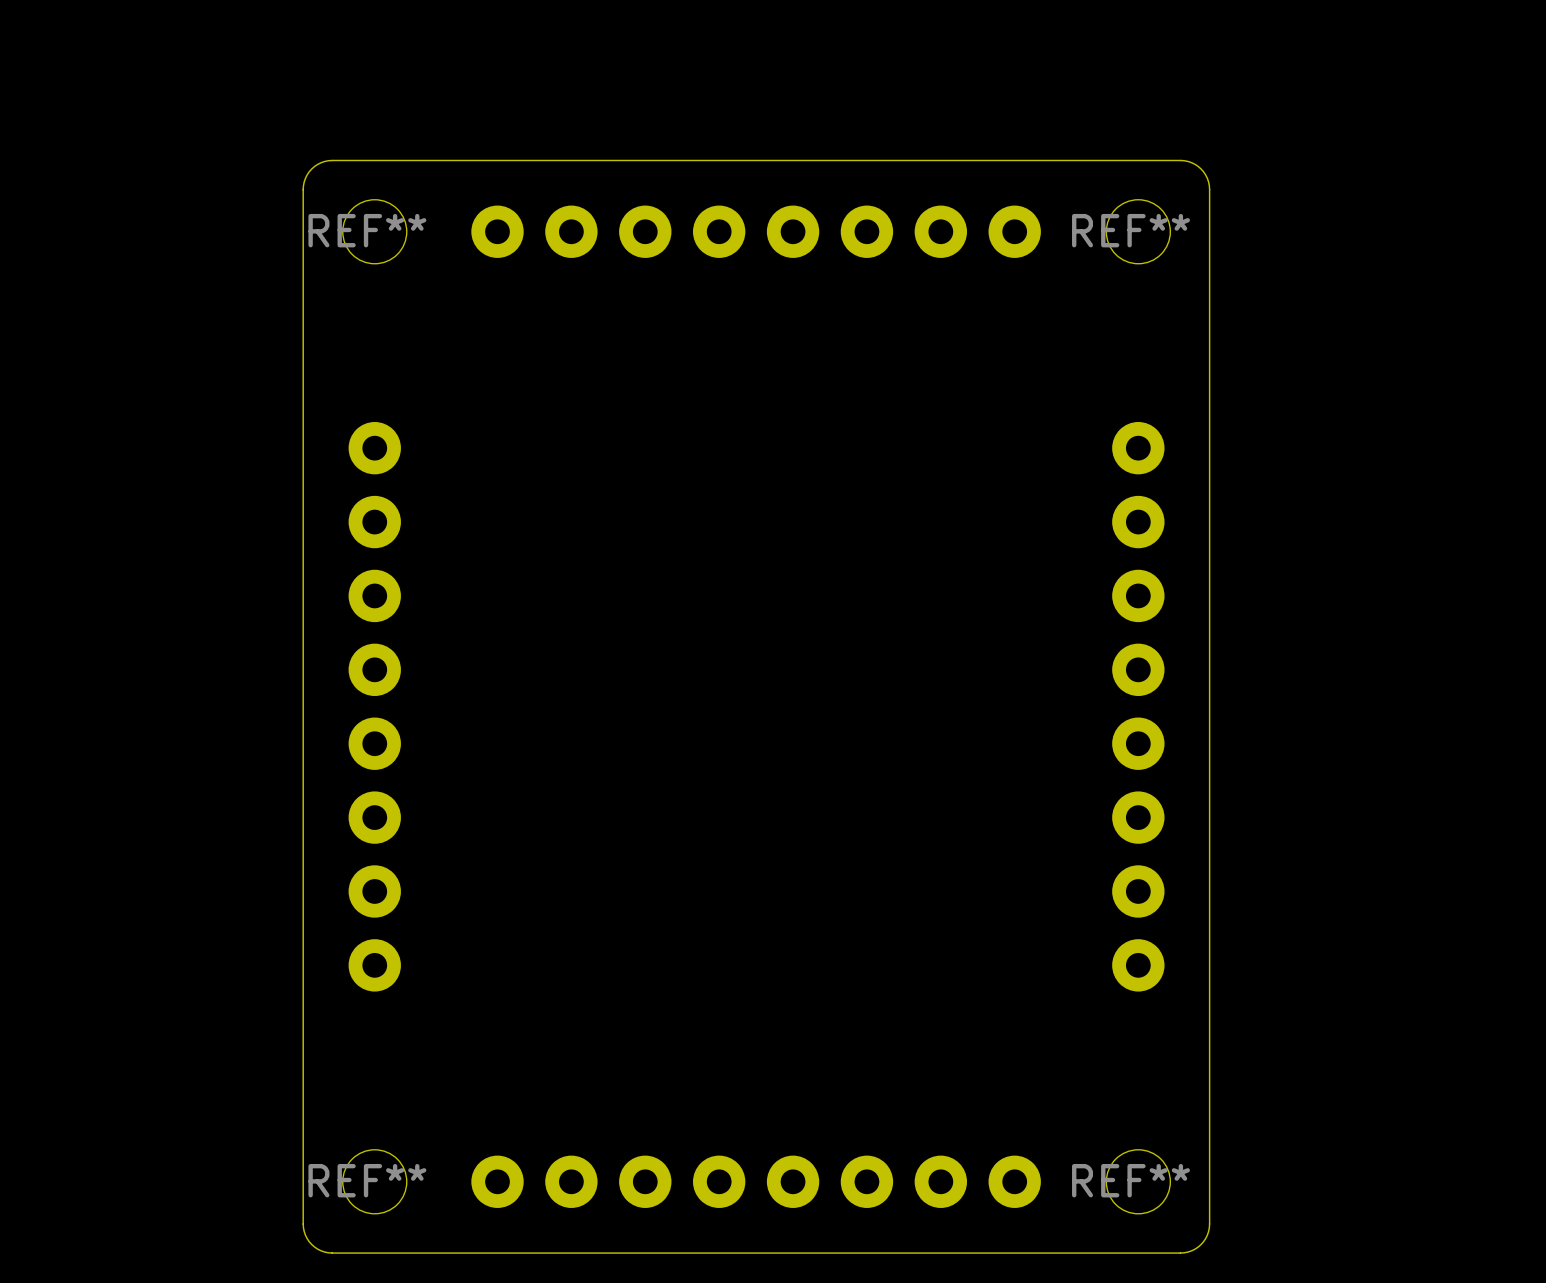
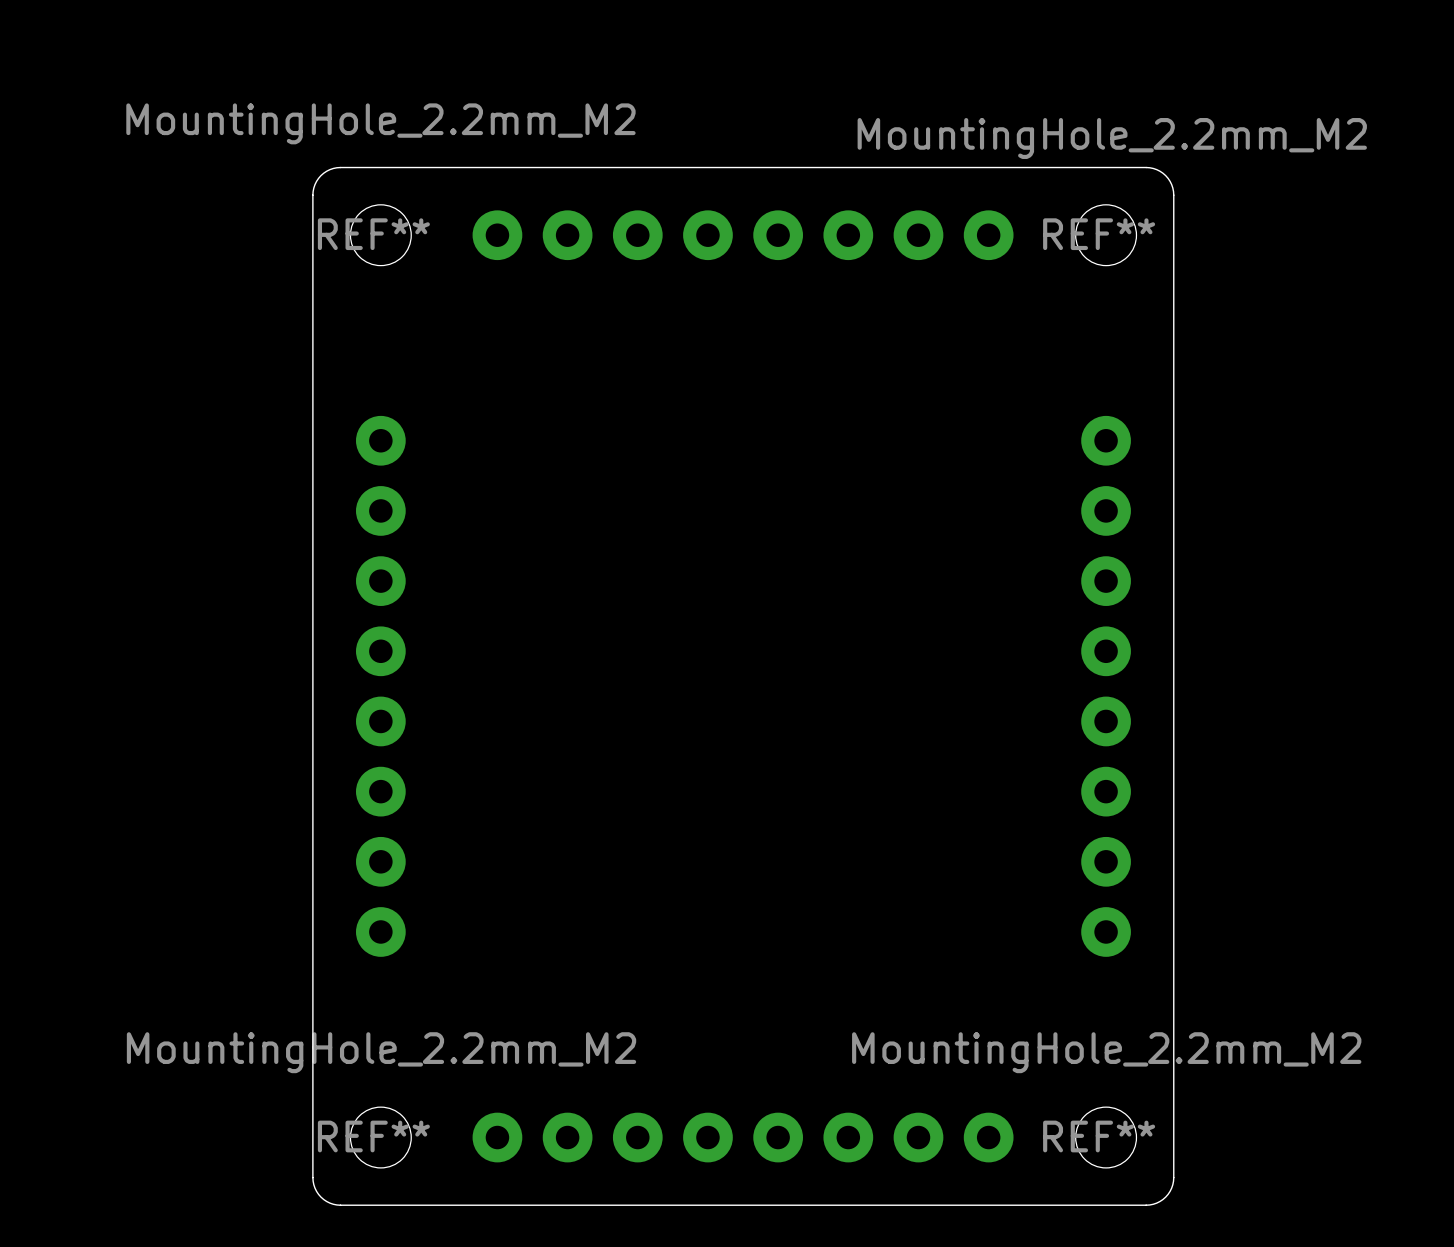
REF** value: none -> MountingHole_2.2mm_M2 (380, 123)
REF** value: none -> MountingHole_2.2mm_M2 (1112, 138)
REF** value: none -> MountingHole_2.2mm_M2 (381, 1052)
REF** value: none -> MountingHole_2.2mm_M2 (1106, 1052)

